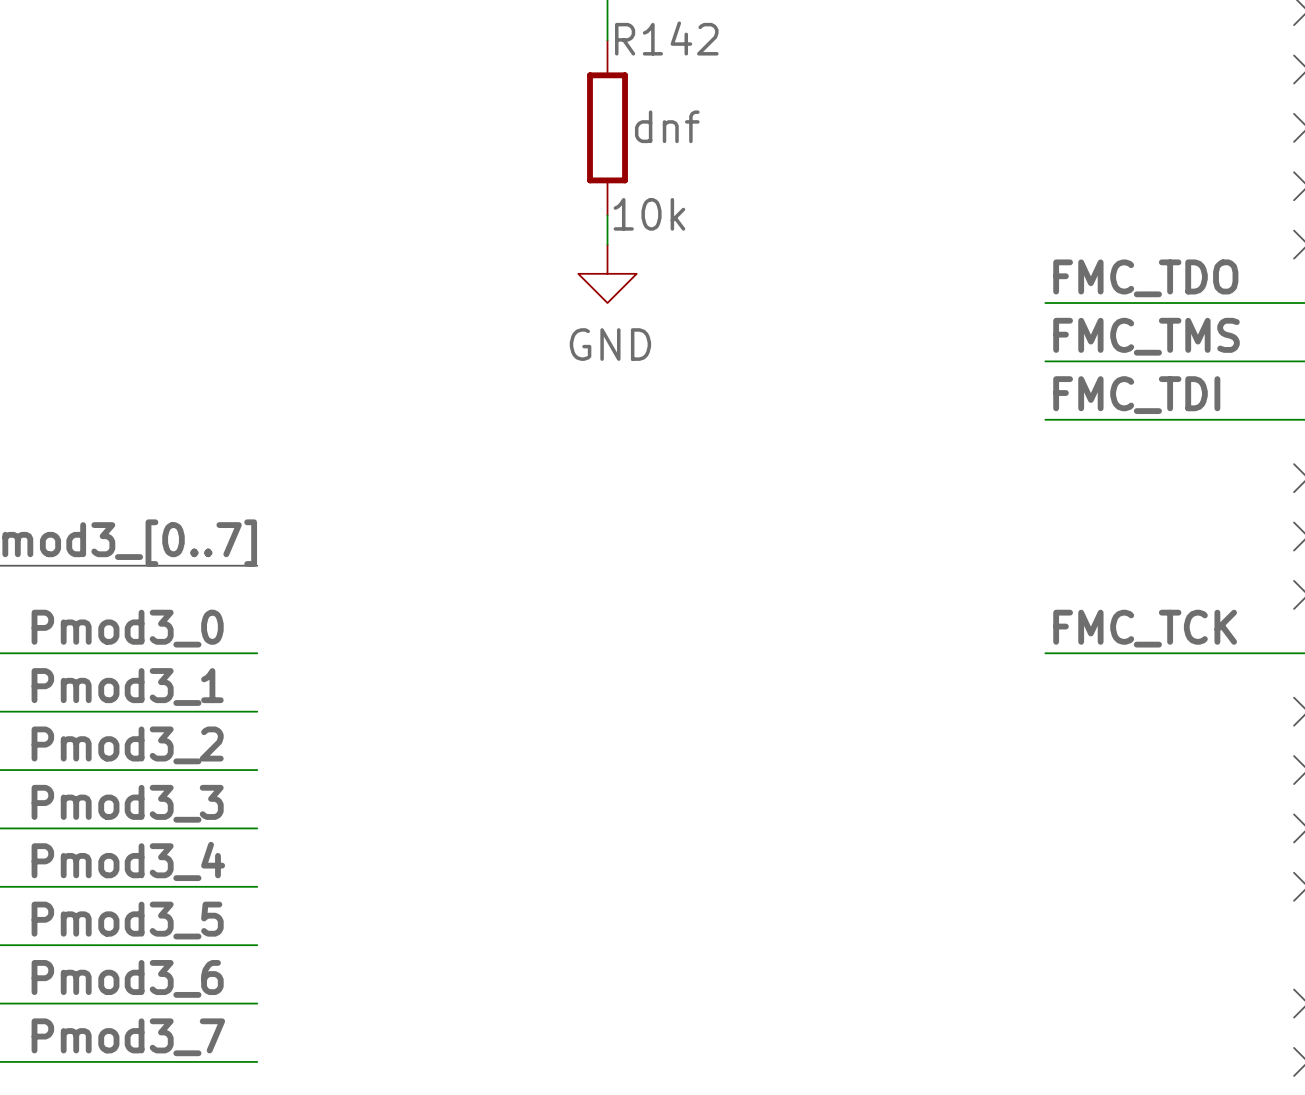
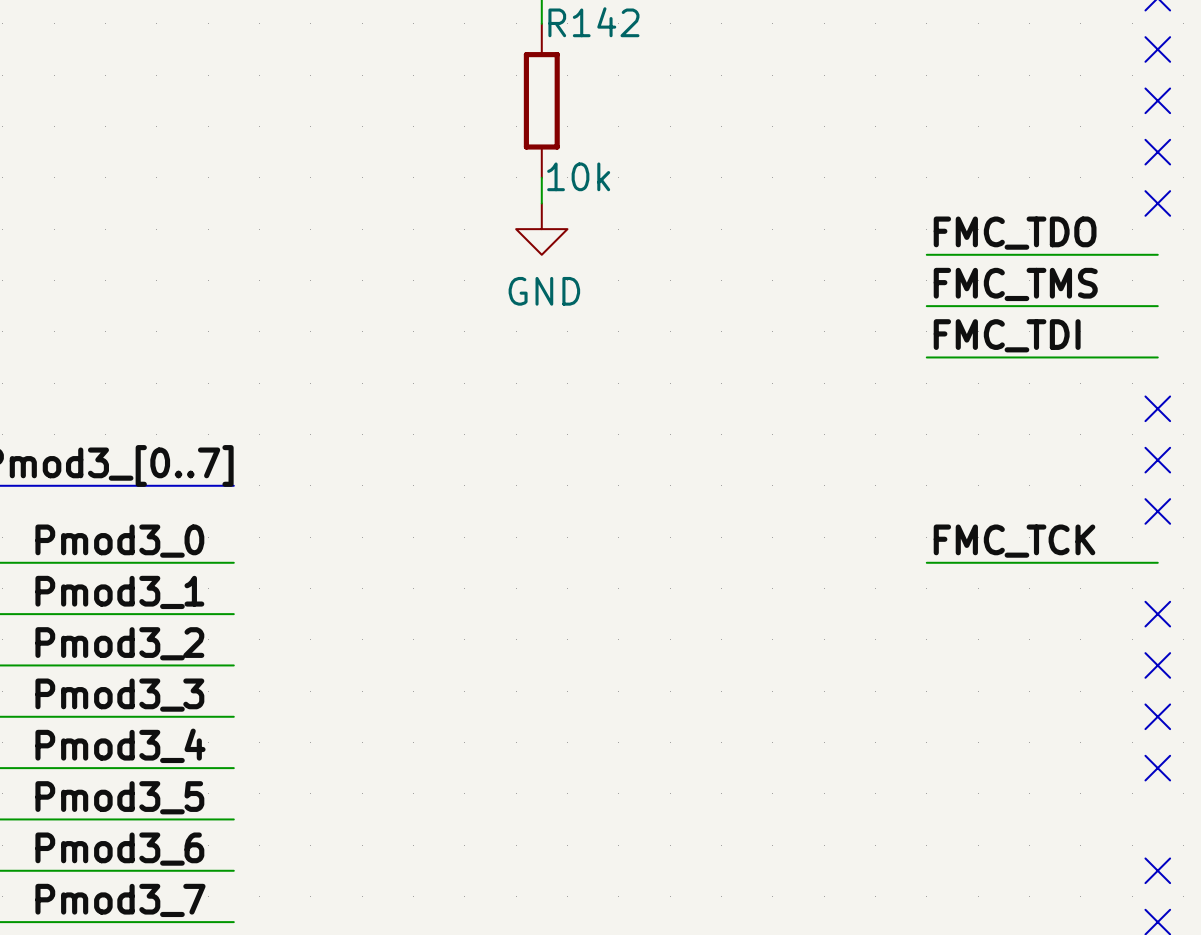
R142 text: dnf (667, 126) -> none

